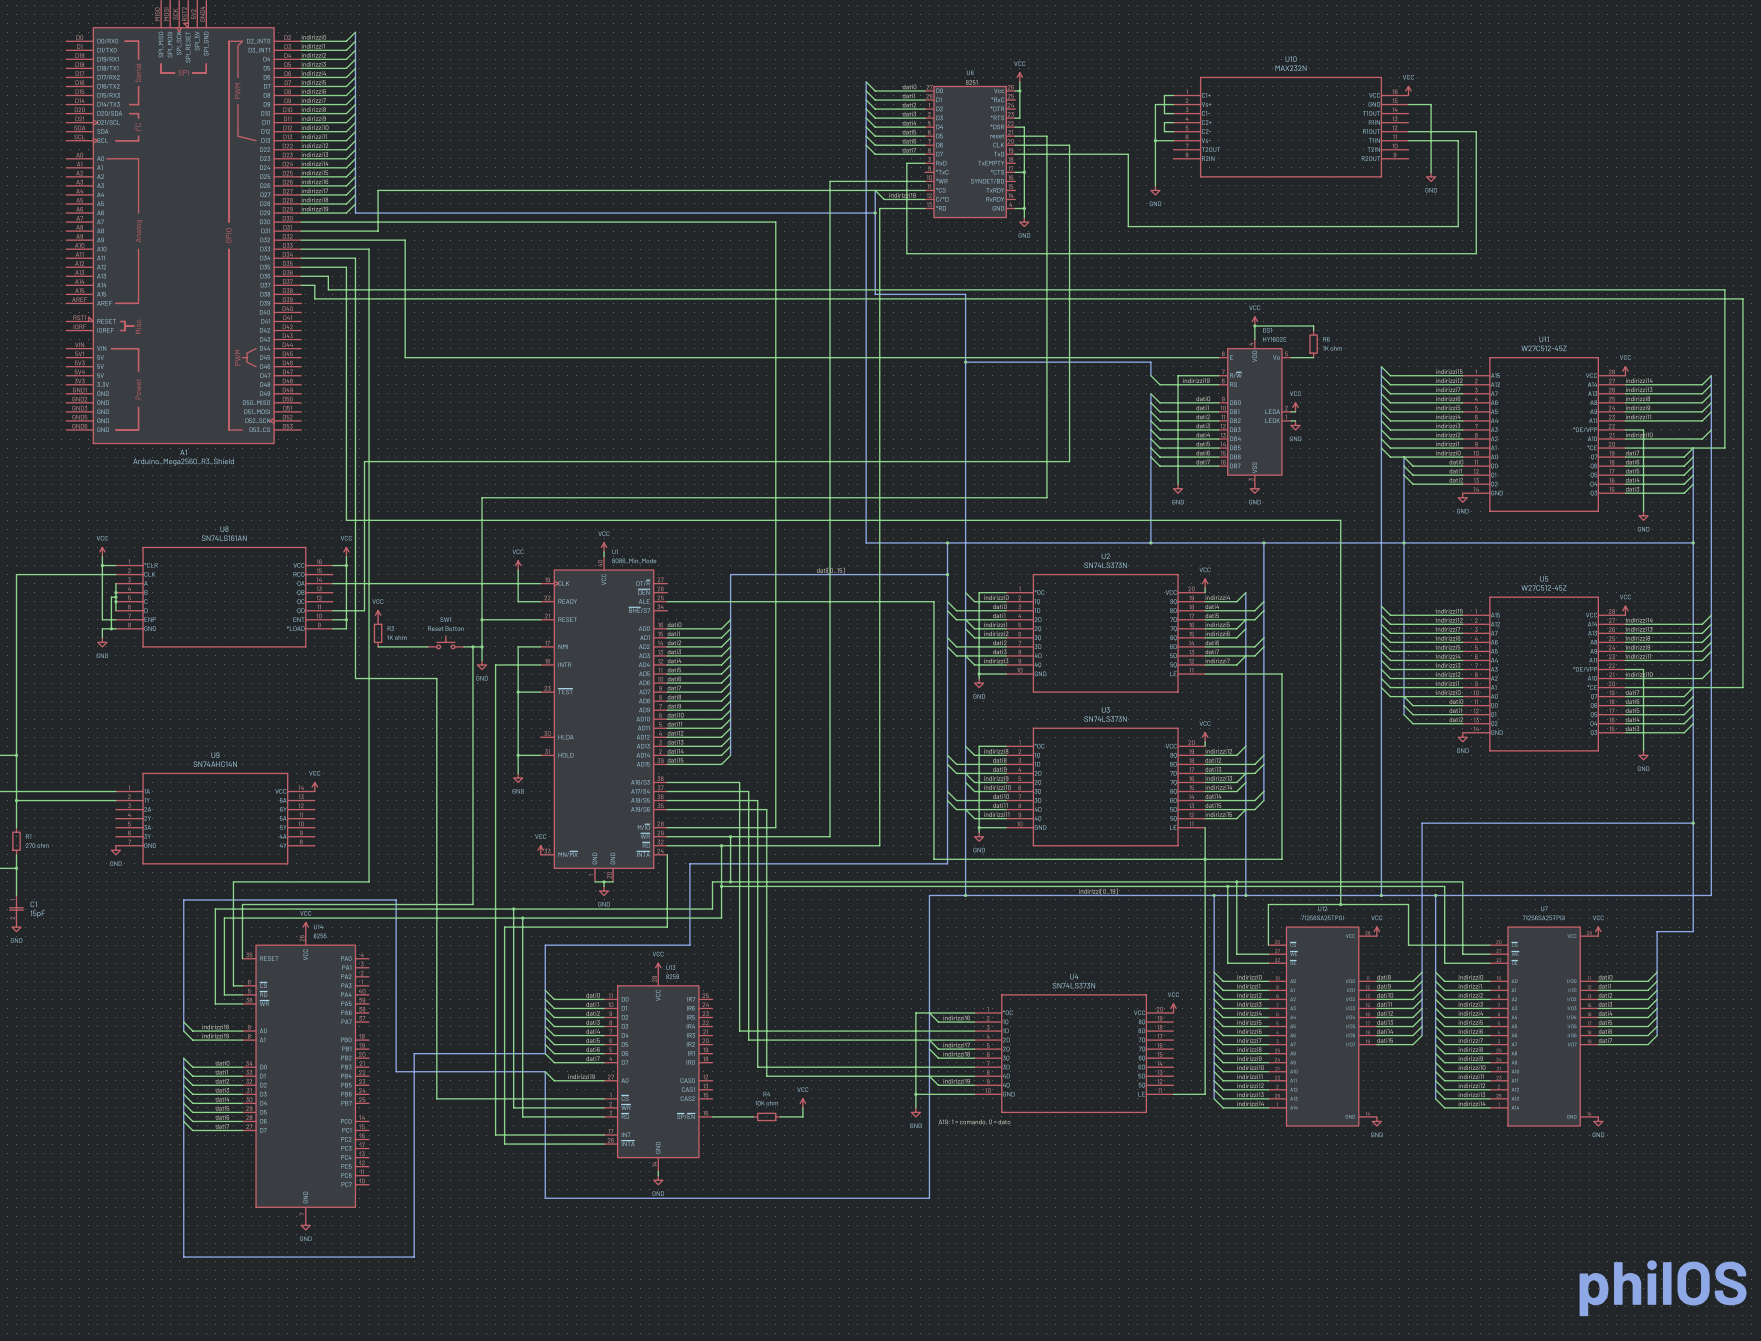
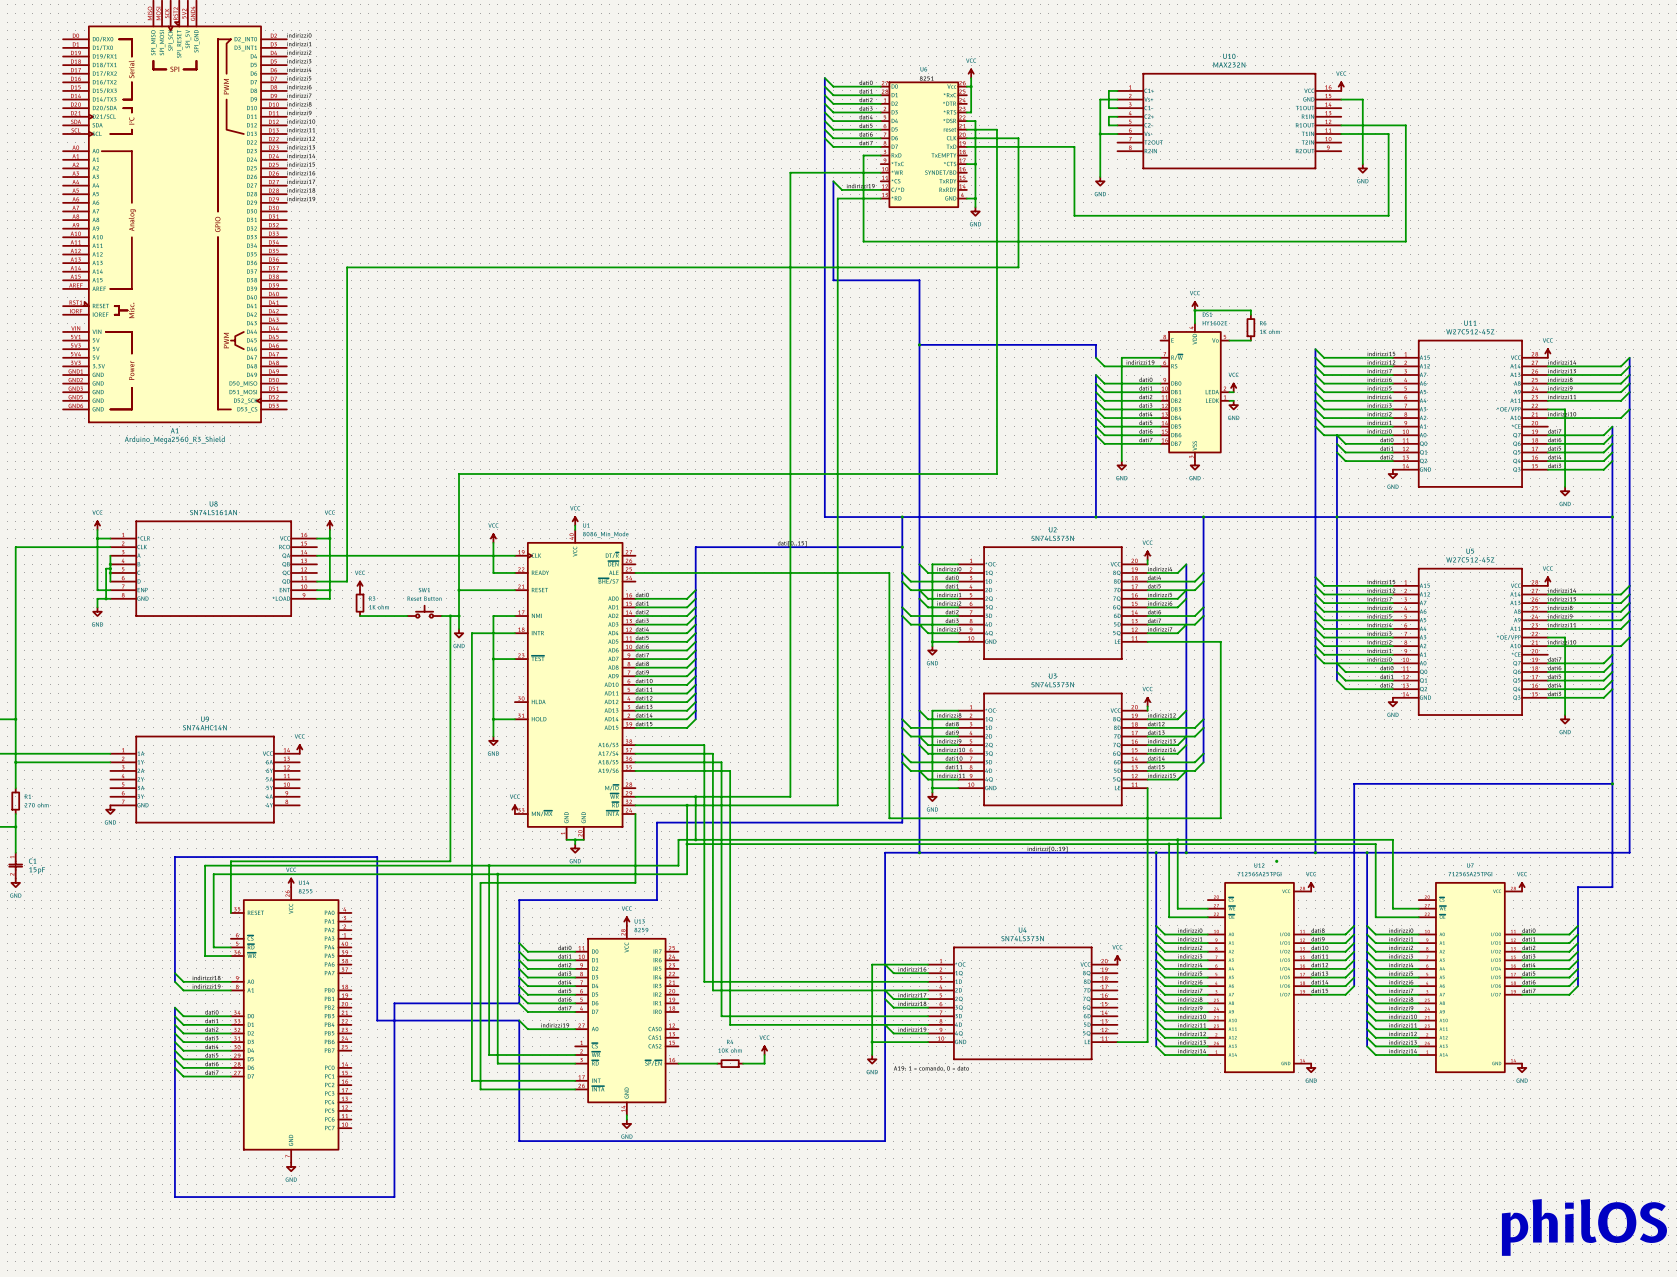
wire: (355, 32) (346, 41) (301, 41) -> none
bus: (355, 32) (355, 213) (875, 213) -> none
wire: (355, 41) (346, 50) (301, 50) -> none
wire: (355, 50) (346, 59) (301, 59) -> none
wire: (355, 59) (346, 68) (301, 68) -> none
wire: (355, 68) (346, 77) (301, 77) -> none
wire: (355, 77) (346, 86) (301, 86) -> none
wire: (355, 86) (346, 95) (301, 95) -> none
wire: (355, 95) (346, 104) (301, 104) -> none
wire: (355, 104) (346, 113) (301, 113) -> none
wire: (355, 113) (346, 122) (301, 122) -> none
wire: (355, 122) (346, 131) (301, 131) -> none
wire: (355, 131) (346, 140) (301, 140) -> none
wire: (355, 140) (346, 149) (301, 149) -> none
wire: (355, 149) (346, 158) (301, 158) -> none
wire: (355, 158) (346, 167) (301, 167) -> none
wire: (355, 167) (346, 176) (301, 176) -> none
wire: (355, 176) (346, 185) (301, 185) -> none
wire: (355, 185) (346, 194) (301, 194) -> none
wire: (924, 190) (378, 190) (378, 231) (301, 231) -> none
wire: (355, 194) (346, 203) (301, 203) -> none
wire: (355, 203) (346, 213) (301, 213) -> none
junction: (875, 213) -> none
wire: (301, 222) (775, 222) (775, 827) (667, 827) -> none
wire: (301, 240) (405, 240) (405, 357) (1218, 357) -> none
wire: (301, 249) (369, 249) (369, 881) (233, 881) (233, 985) (242, 985) -> none
wire: (301, 258) (355, 258) (355, 678) (436, 678) (436, 1098) (604, 1098) -> none
wire: (301, 267) (346, 267) (346, 520) (1340, 520) (1340, 904) -> none
wire: (301, 276) (328, 276) (328, 289) (1724, 289) (1724, 448) (1625, 448) -> none
wire: (1069, 280) (1069, 461) (364, 461) -> (1018, 267) (347, 267) (347, 439)
wire: (301, 285) (314, 285) (314, 298) (1742, 298) (1742, 687) (1625, 687) -> none
wire: (1268, 945) (1268, 904) (1408, 904) (1408, 945) (1489, 945) -> none

